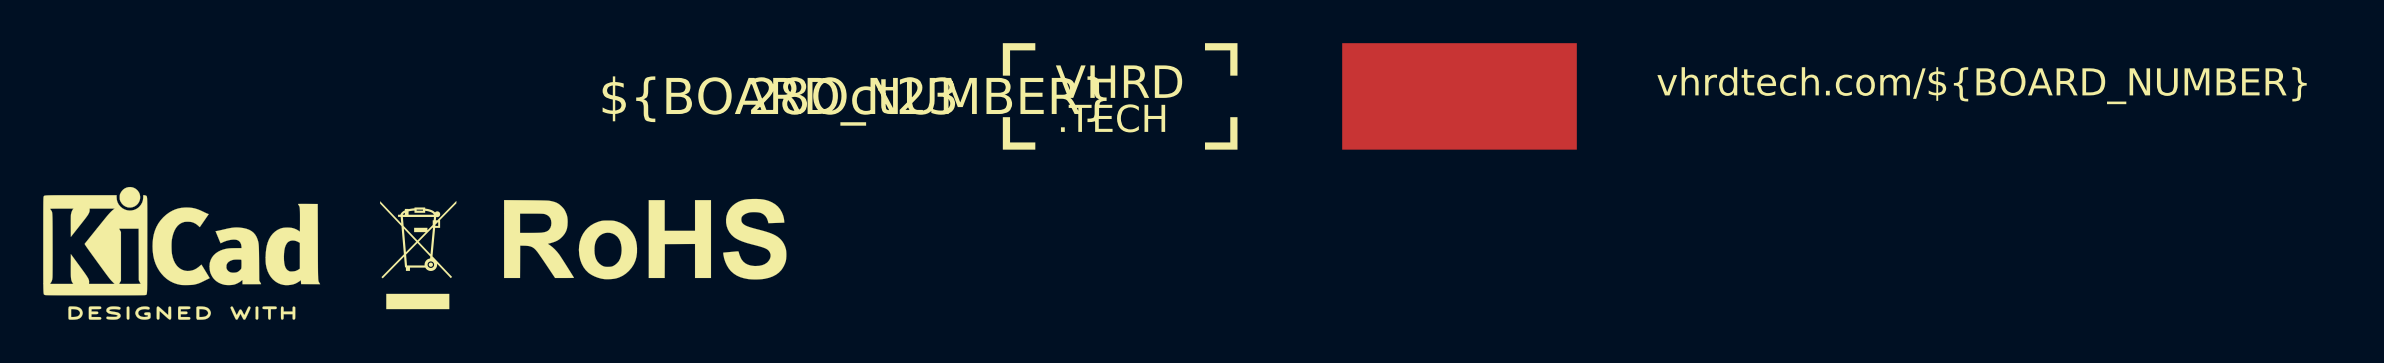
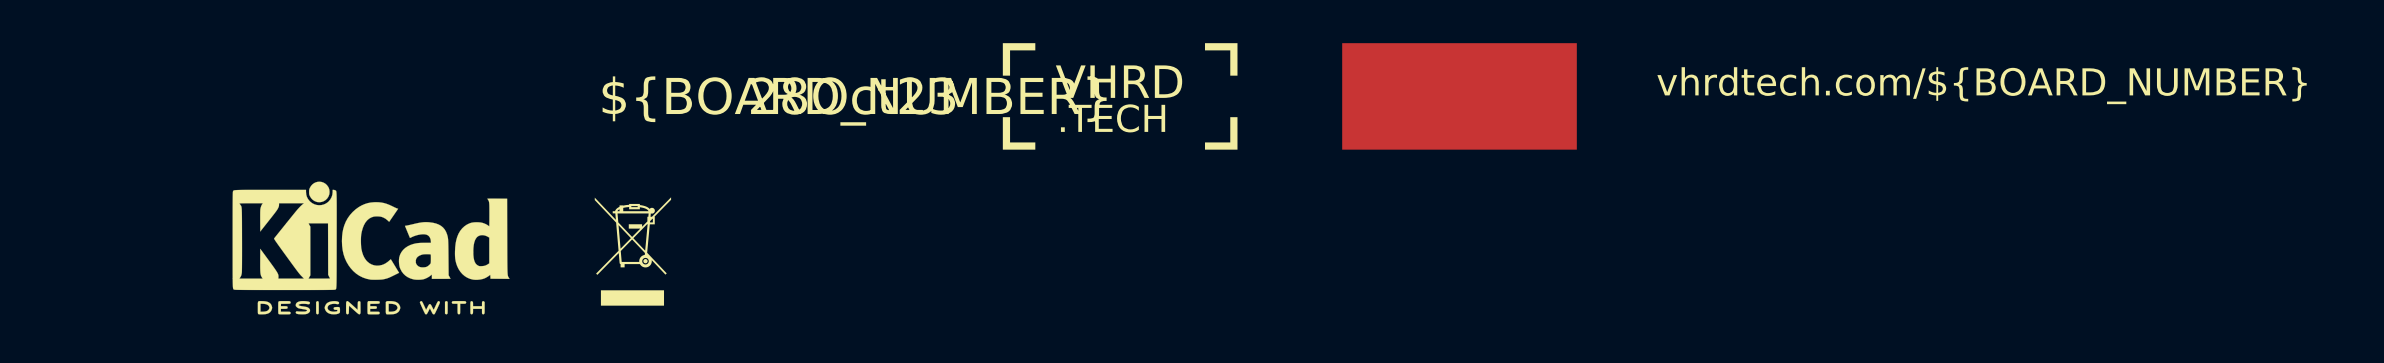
drawing: [504, 198, 787, 280] -> none
drawing position: (181, 253) -> (371, 248)
drawing position: (418, 255) -> (632, 251)

